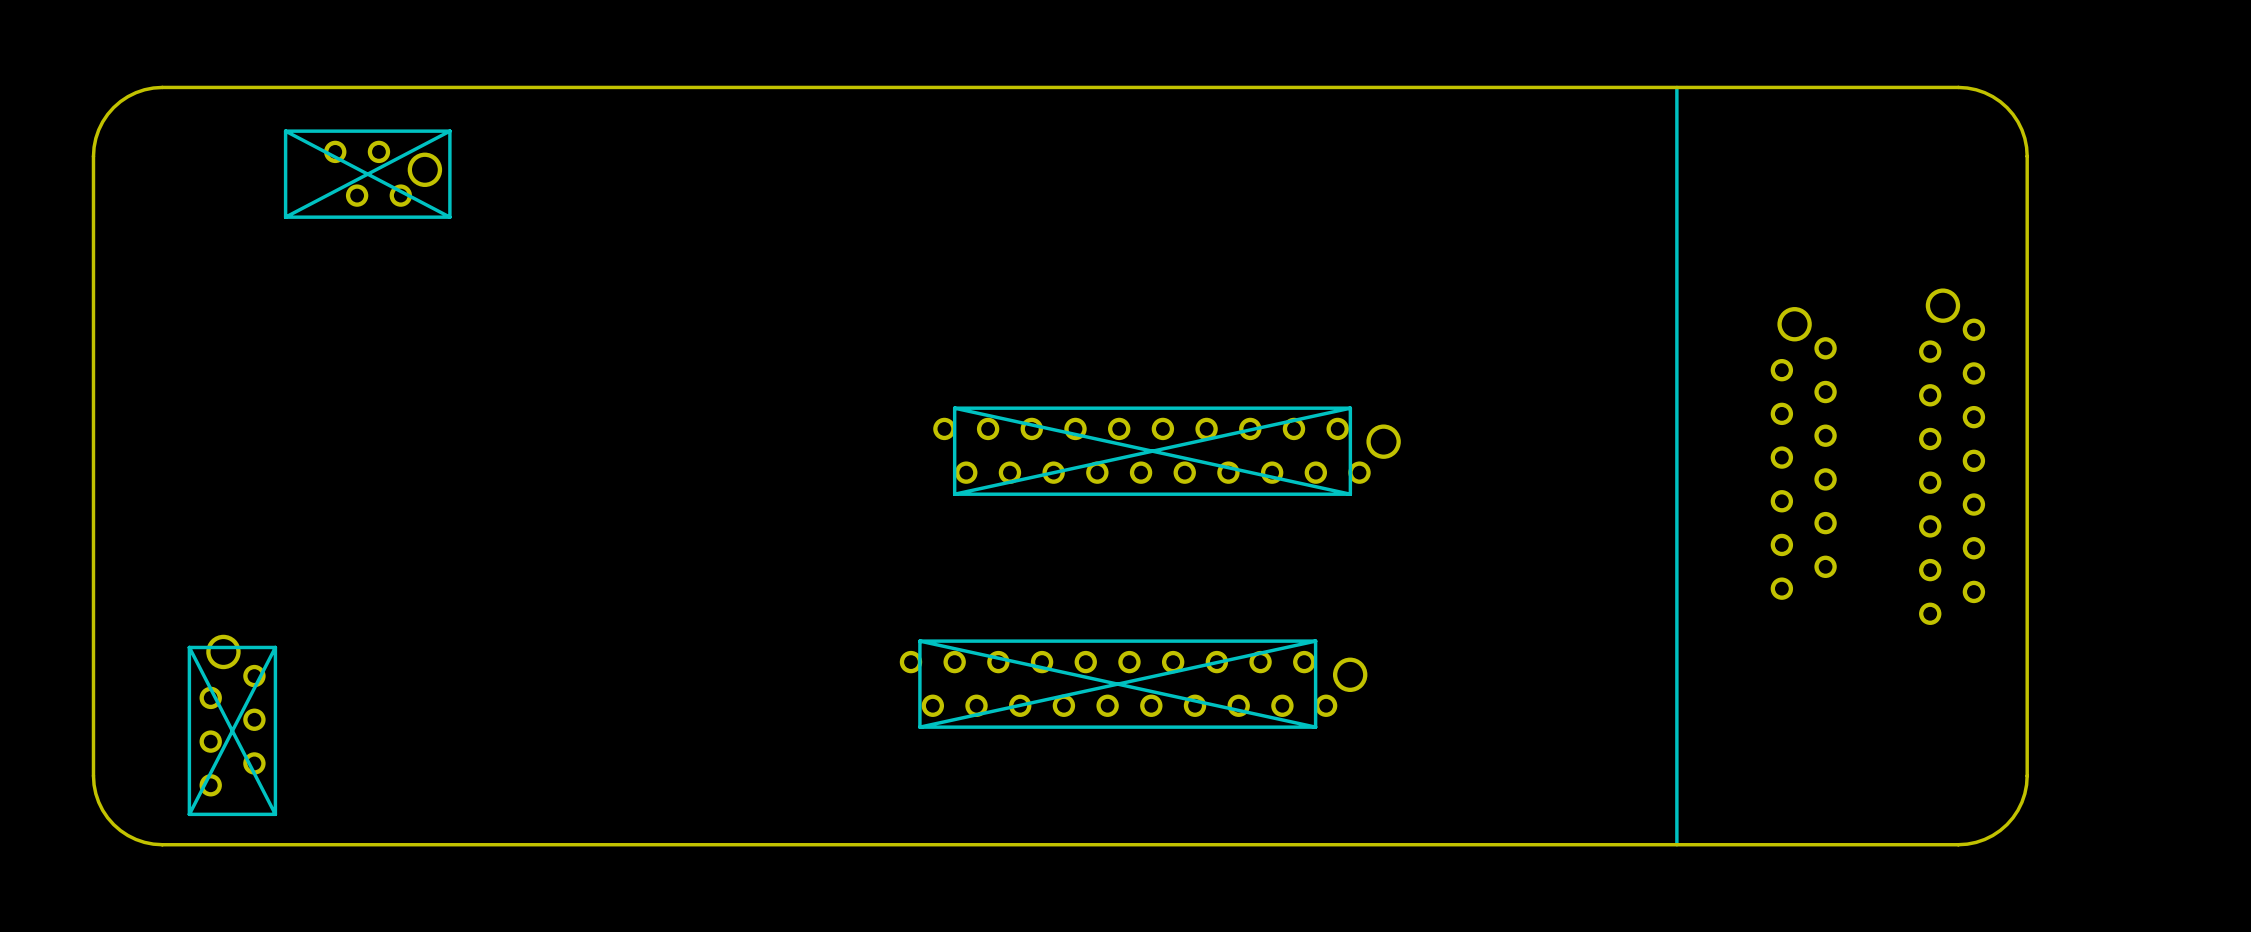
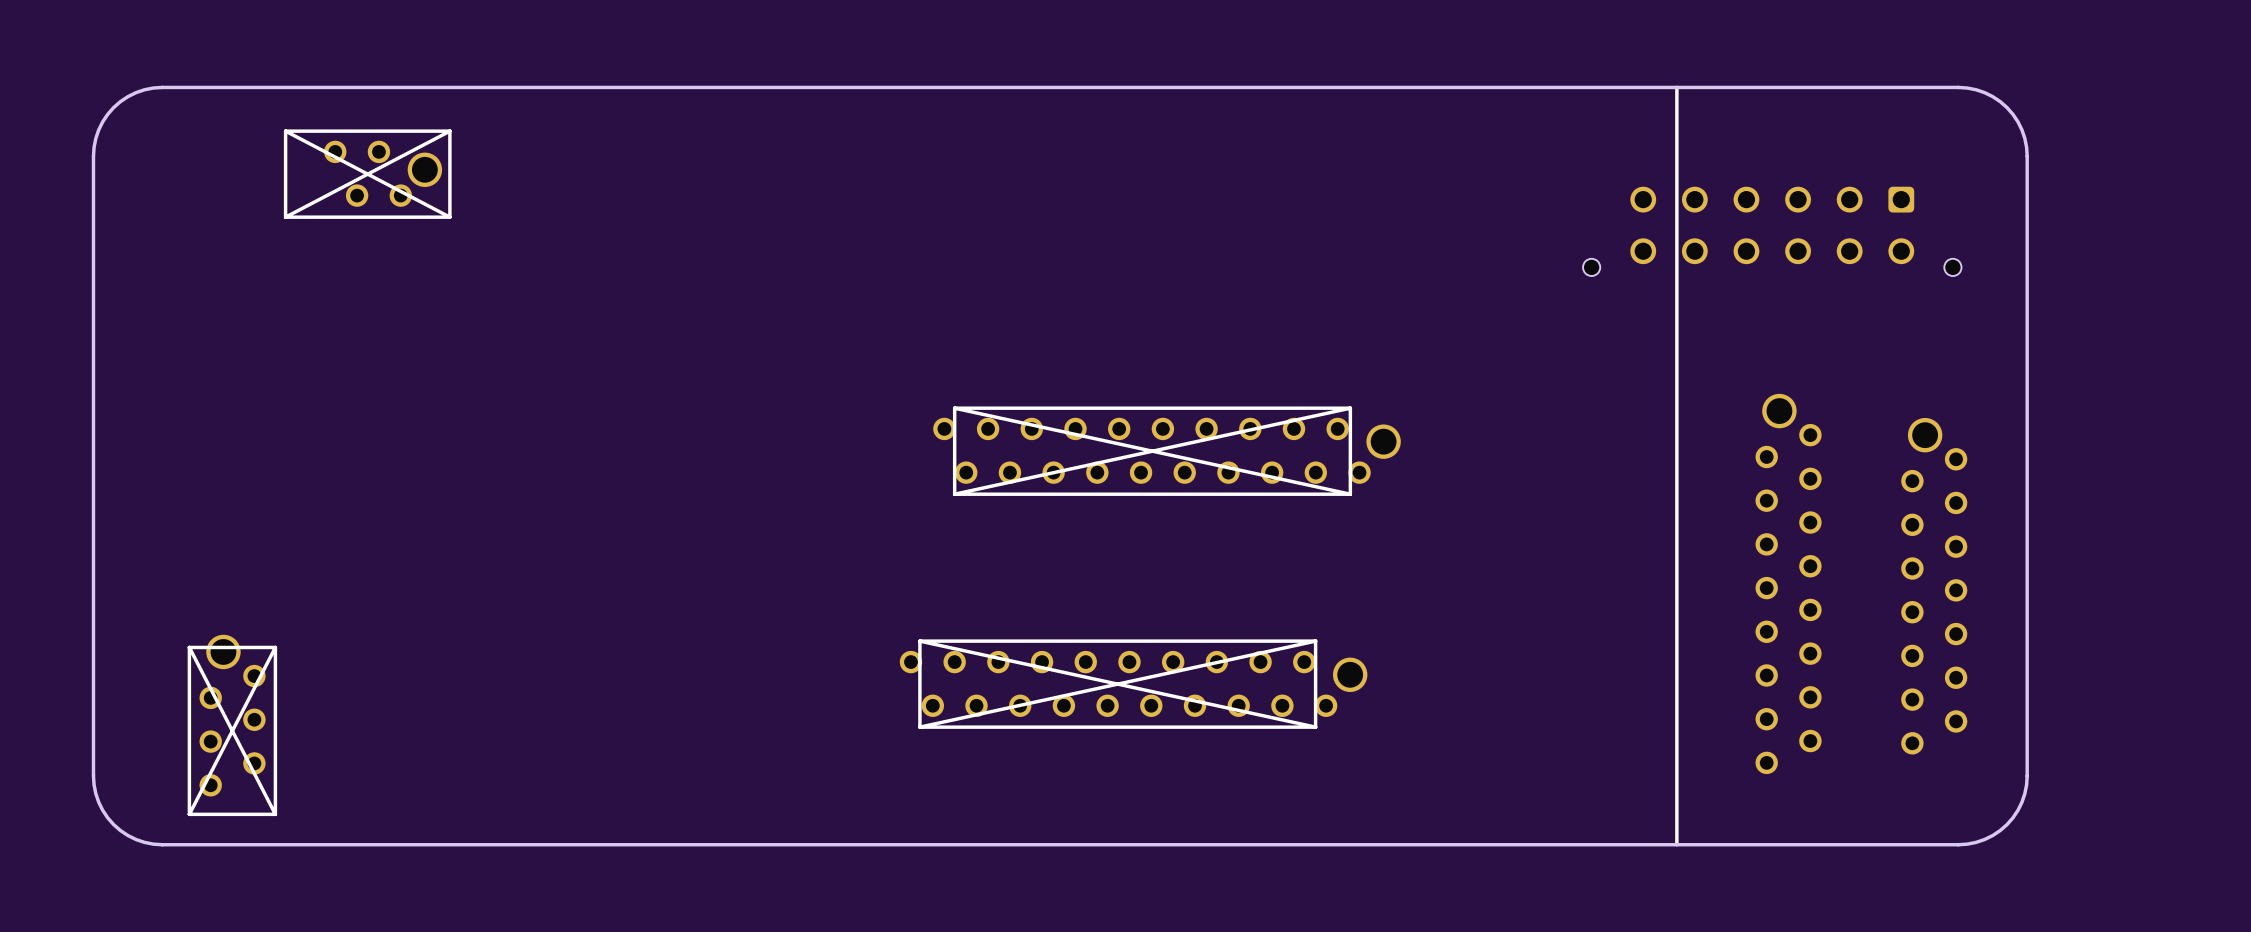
part: none -> (1772, 231)
part: (1803, 453) -> none
part position: (1952, 456) -> (1934, 586)
part: none -> (1788, 583)

